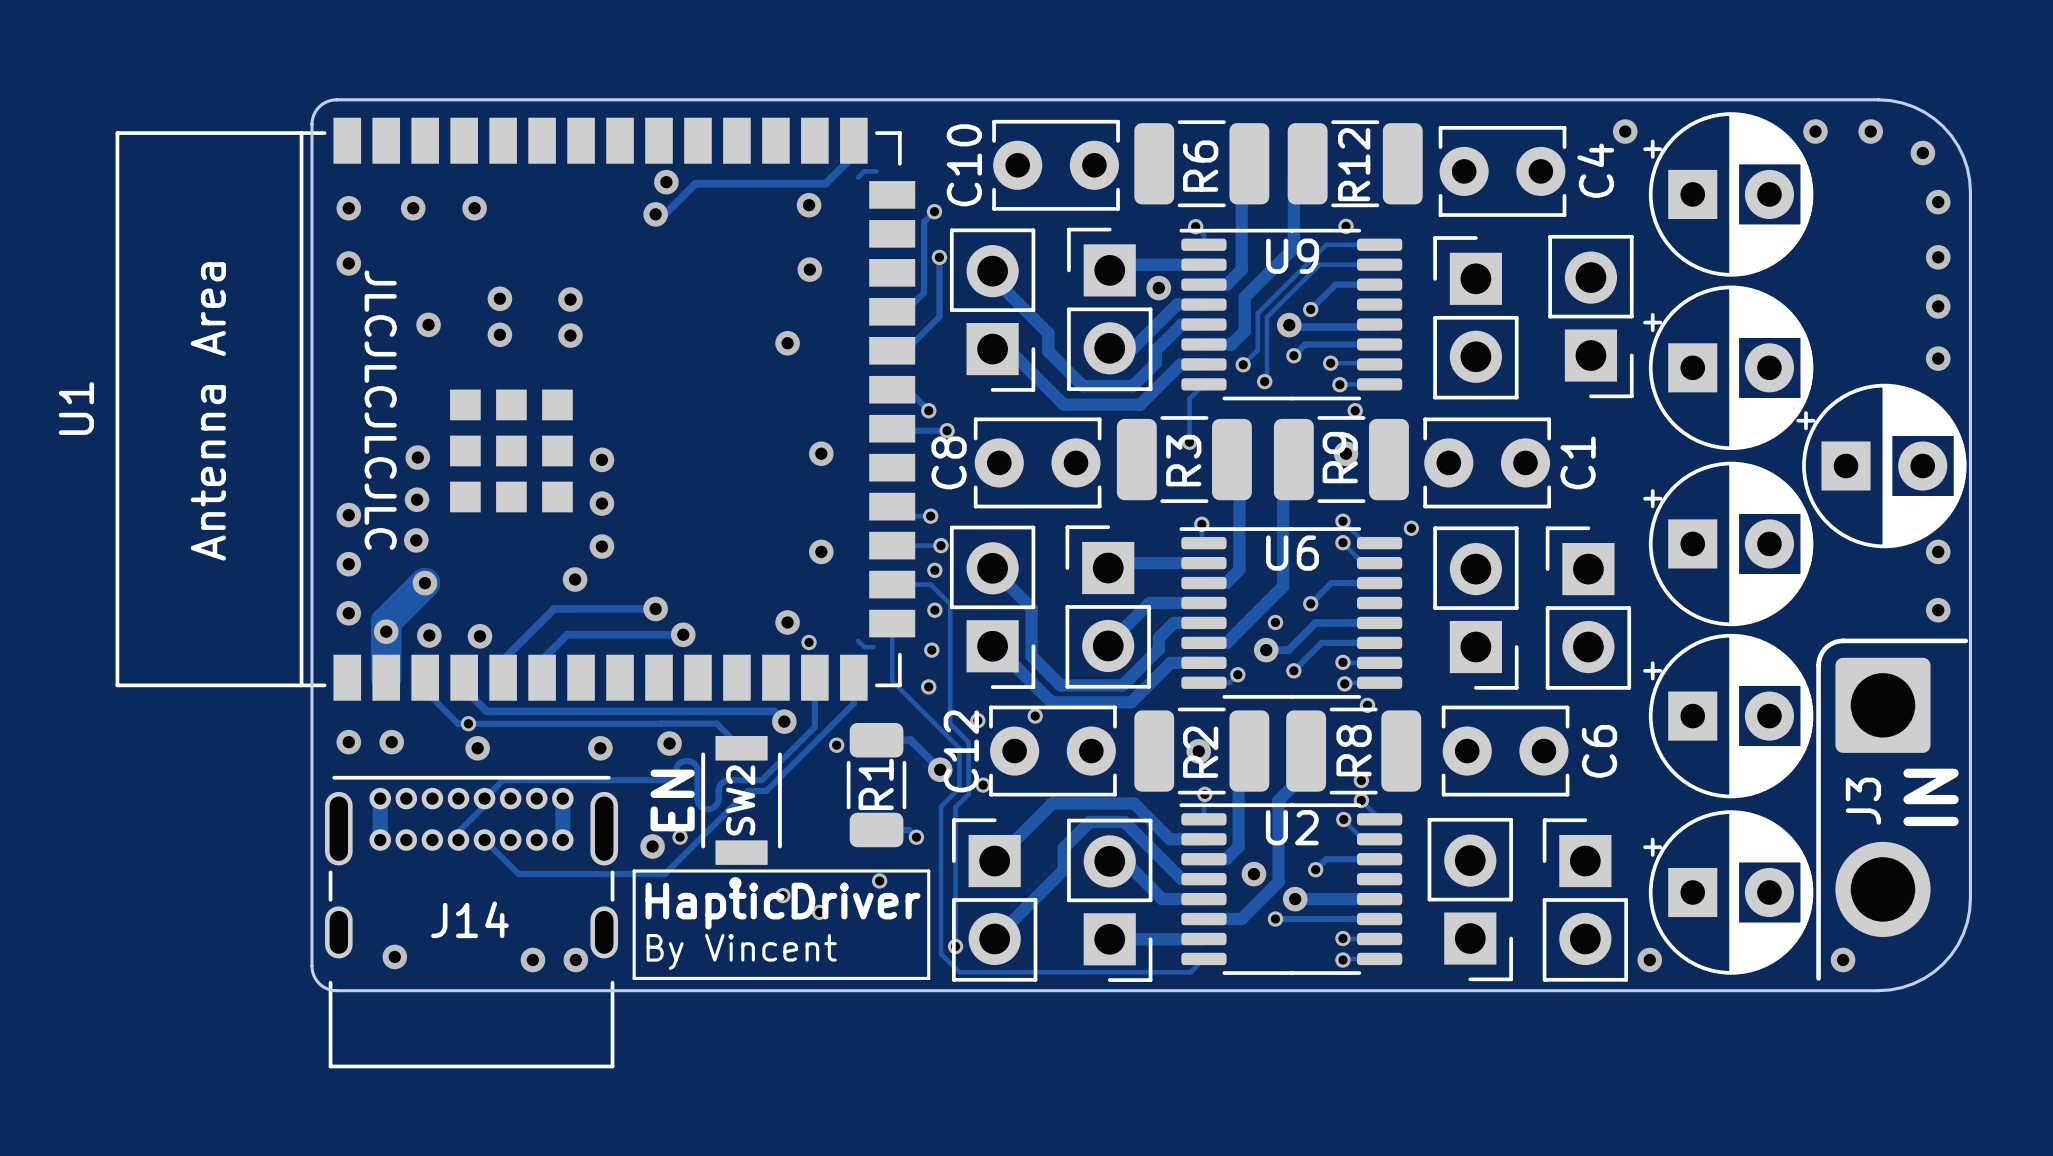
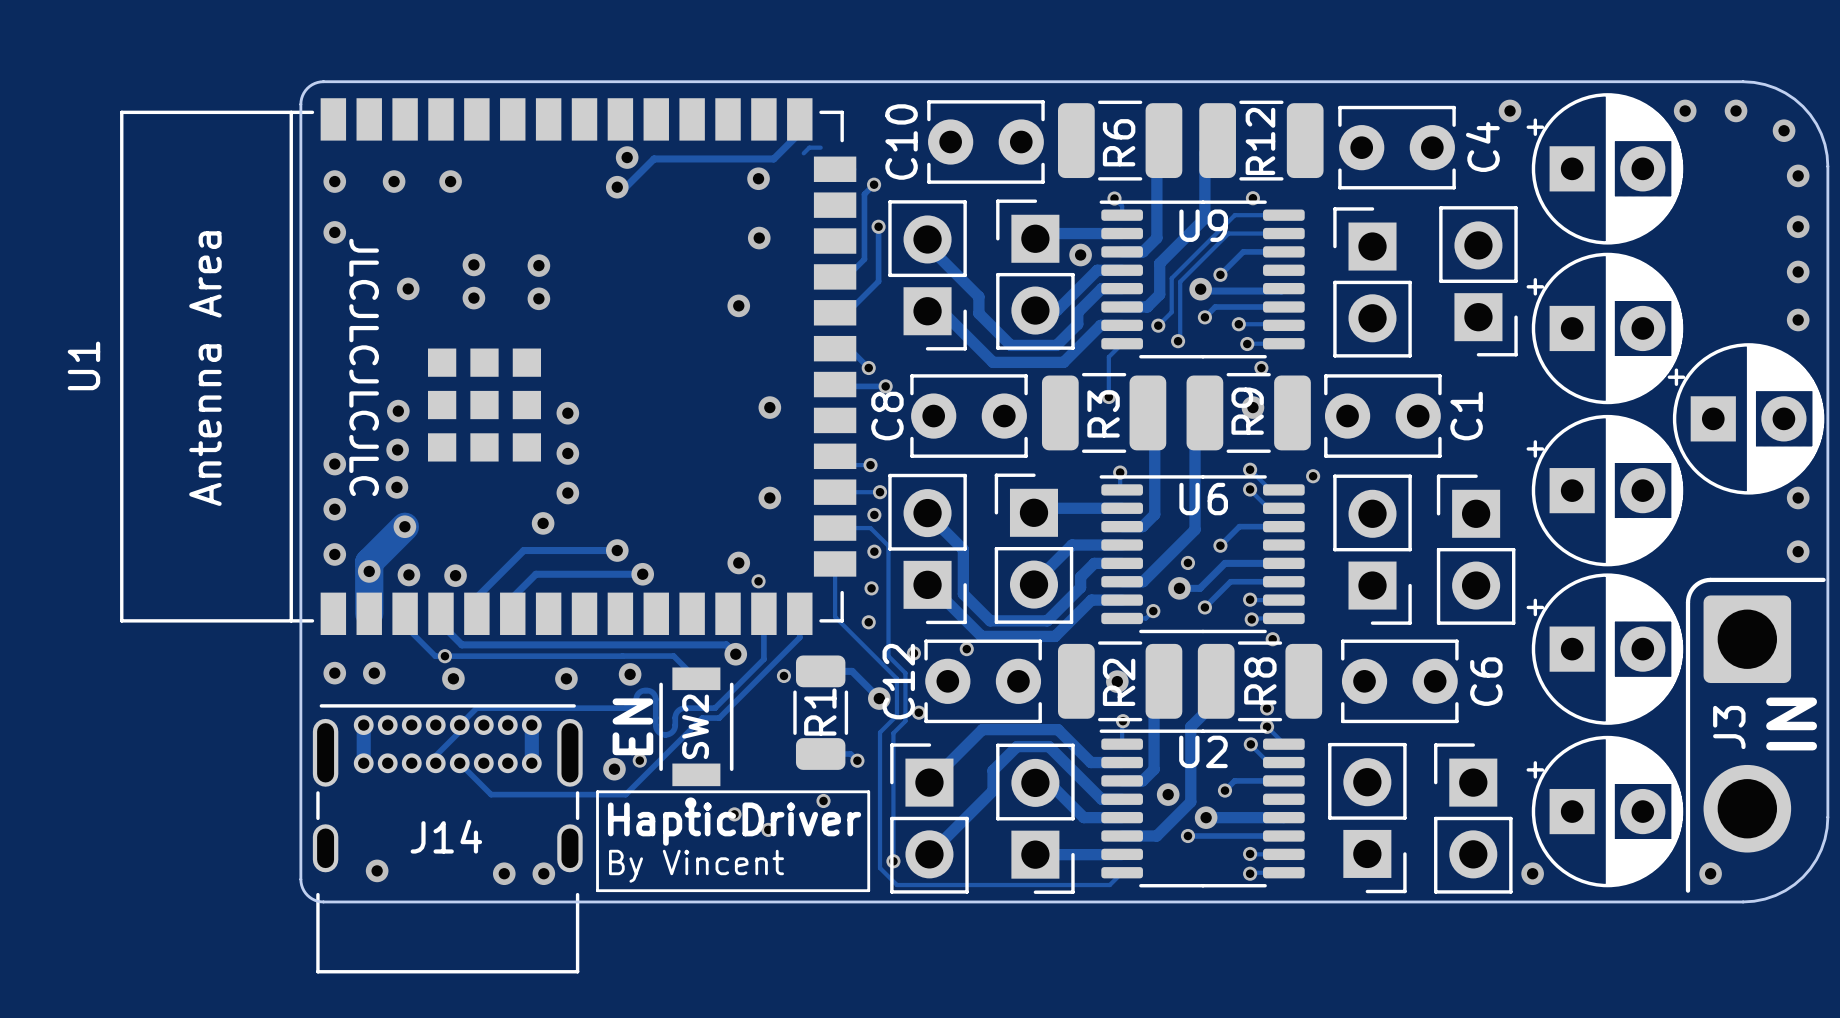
track: (858, 640) (864, 647) (873, 647) -> none

